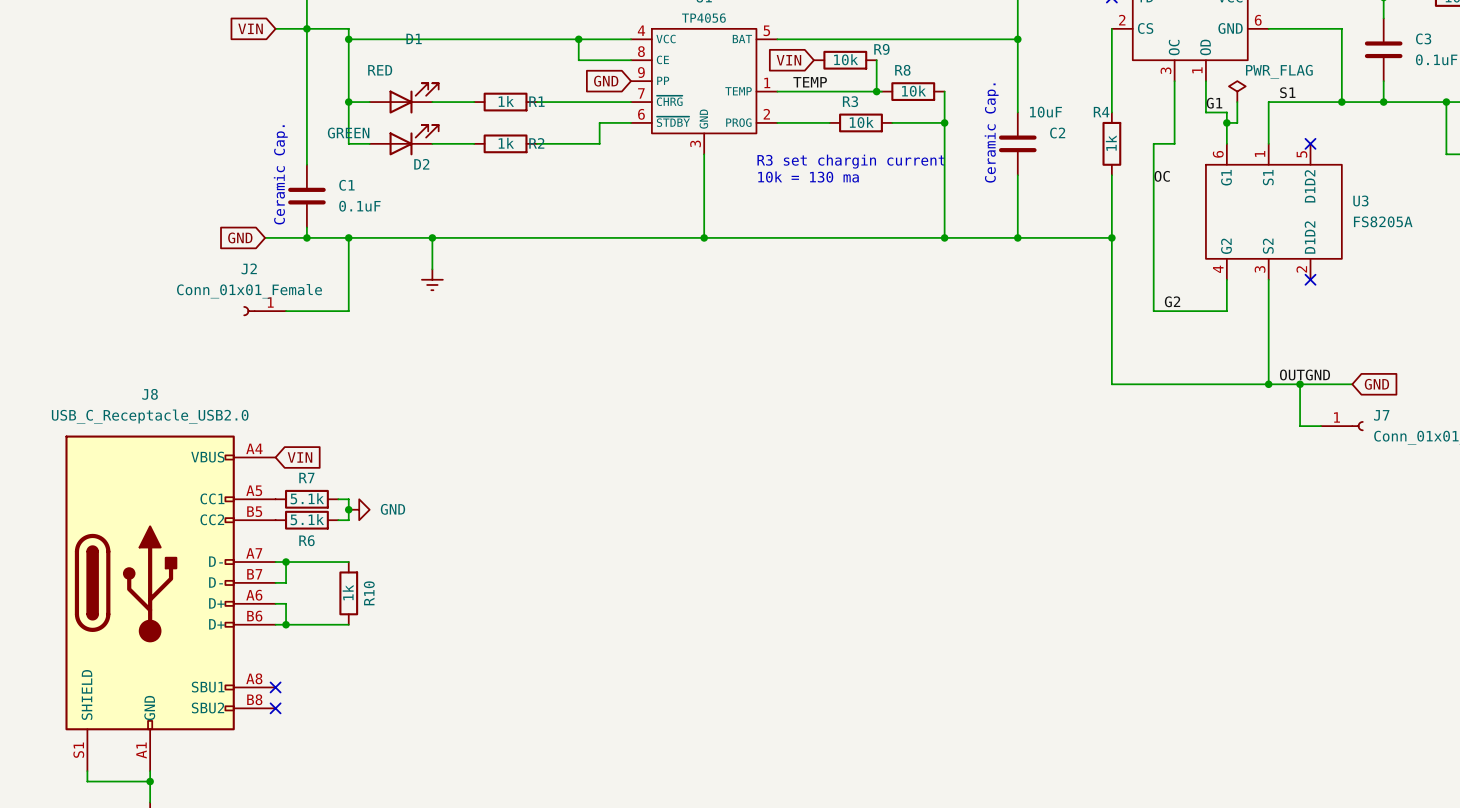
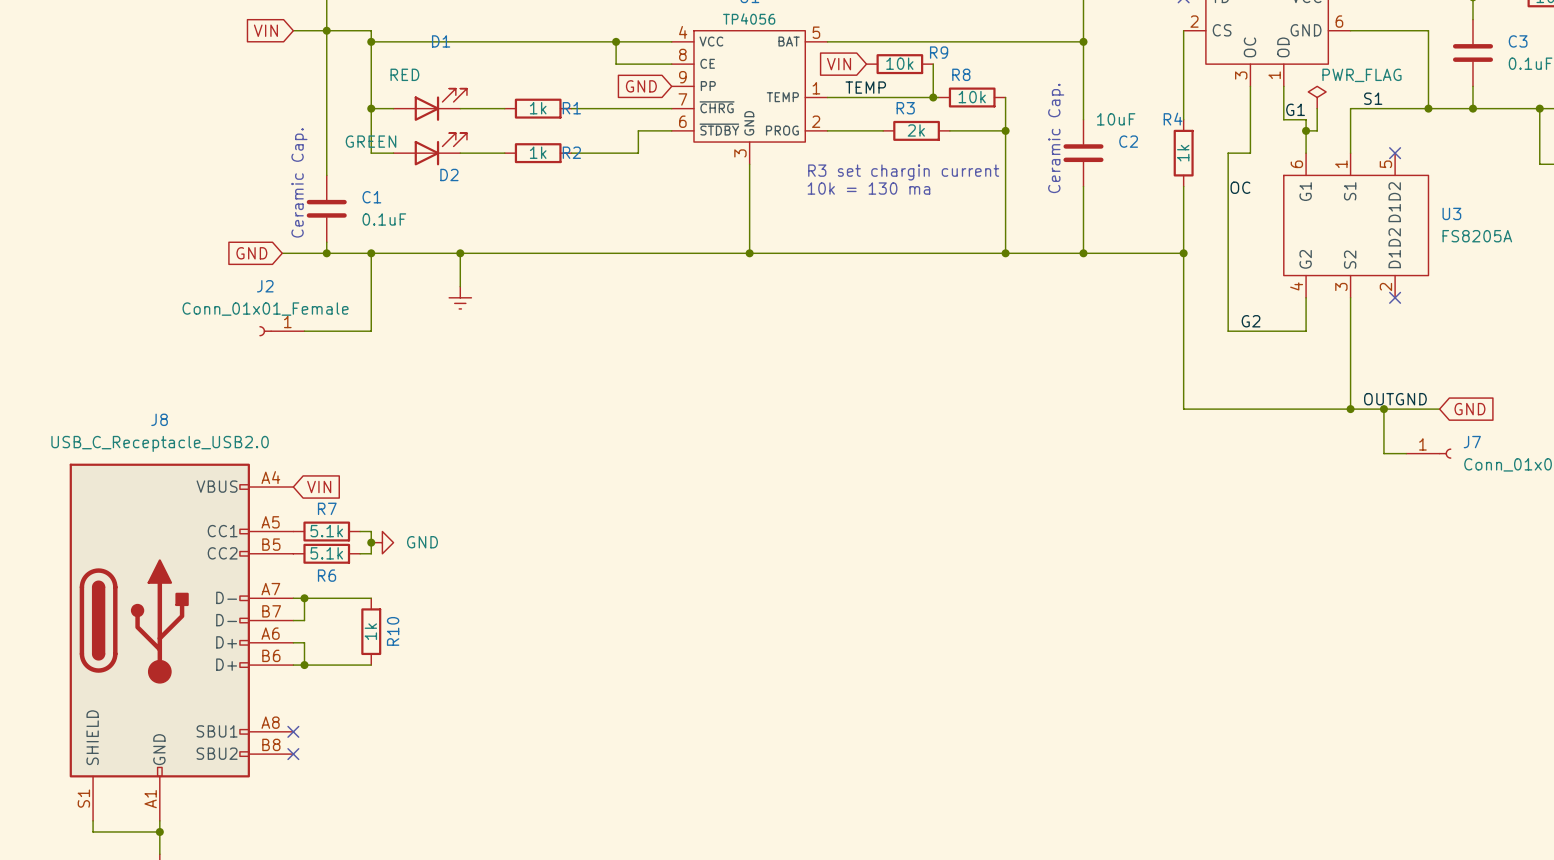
R3 value: 10k (861, 122) -> 2k (916, 130)

